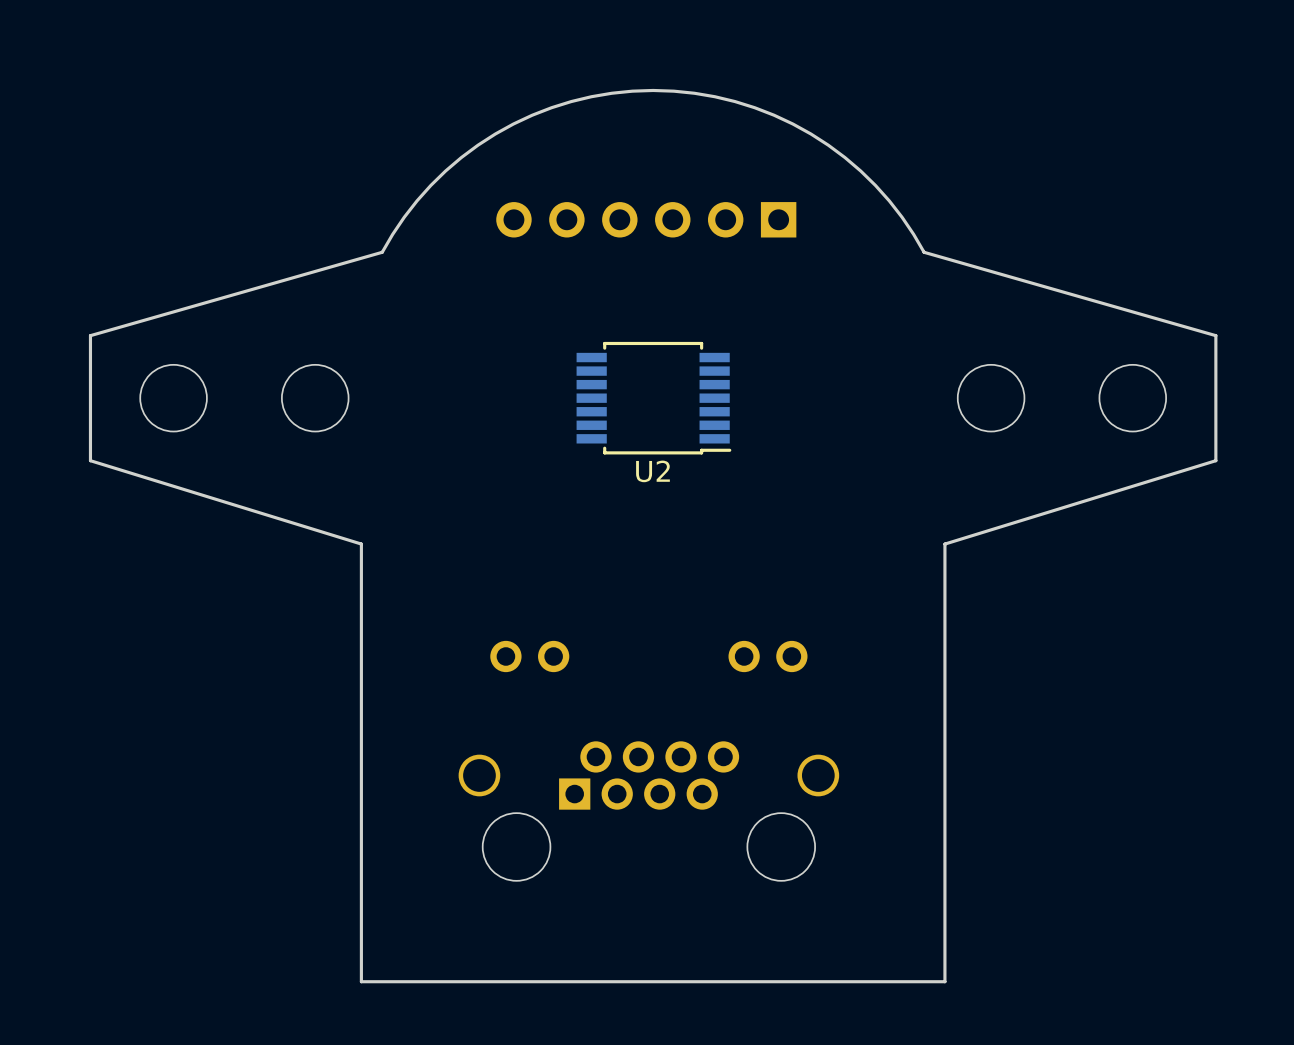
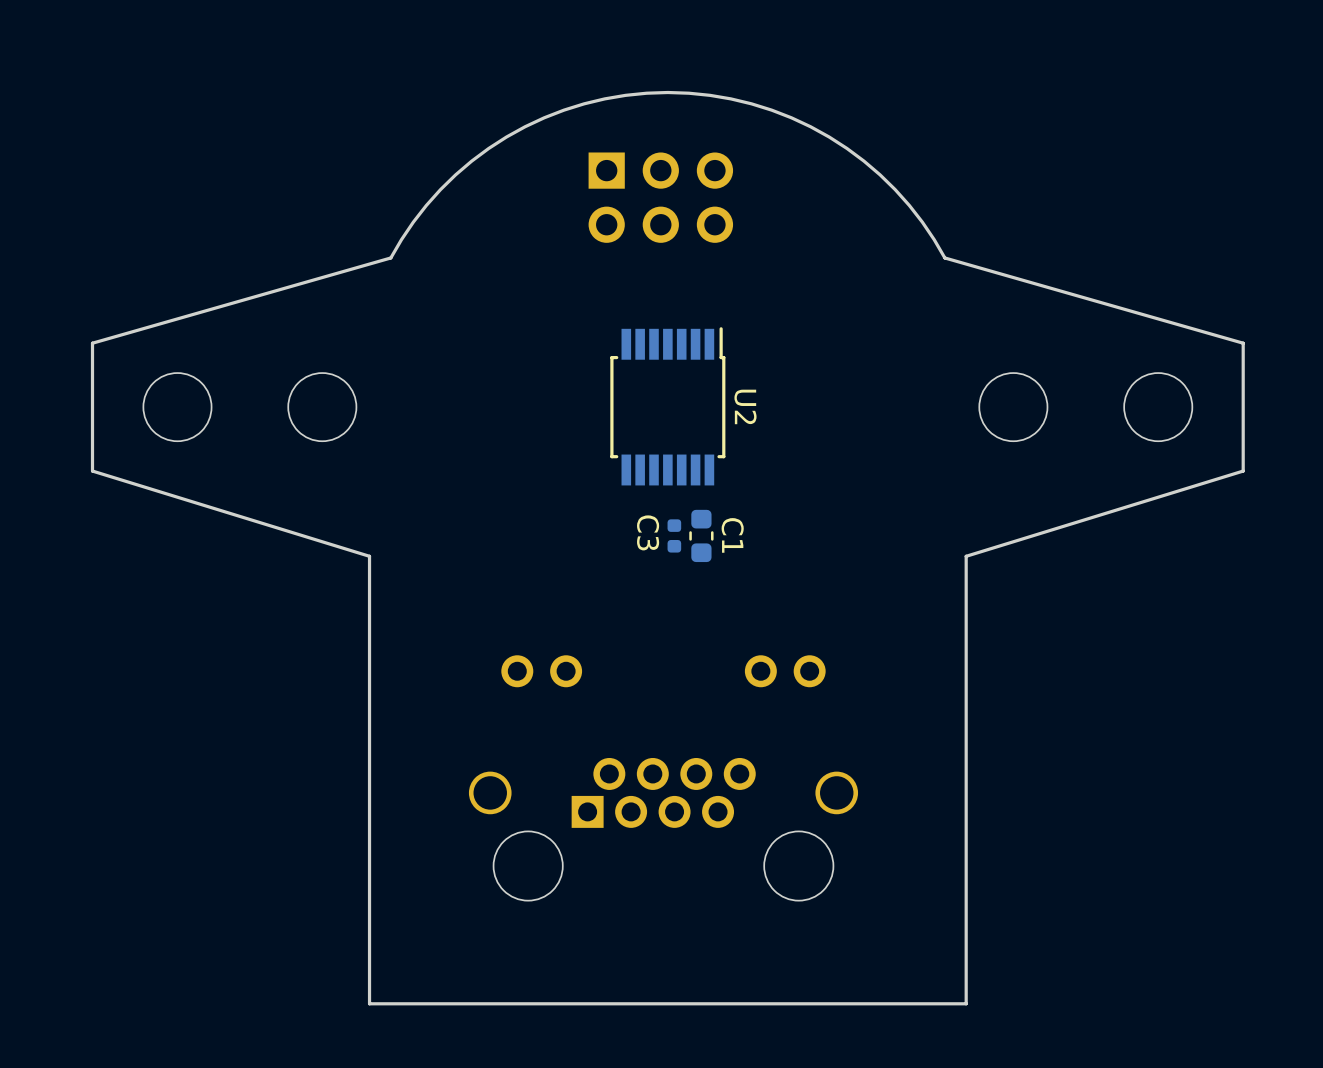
part: none -> (660, 197)
part: (646, 219) -> none
U2 rotation: 0° (653, 398) -> 90° counterclockwise (667, 406)
C3: none -> (674, 535)
C1: none -> (701, 535)

